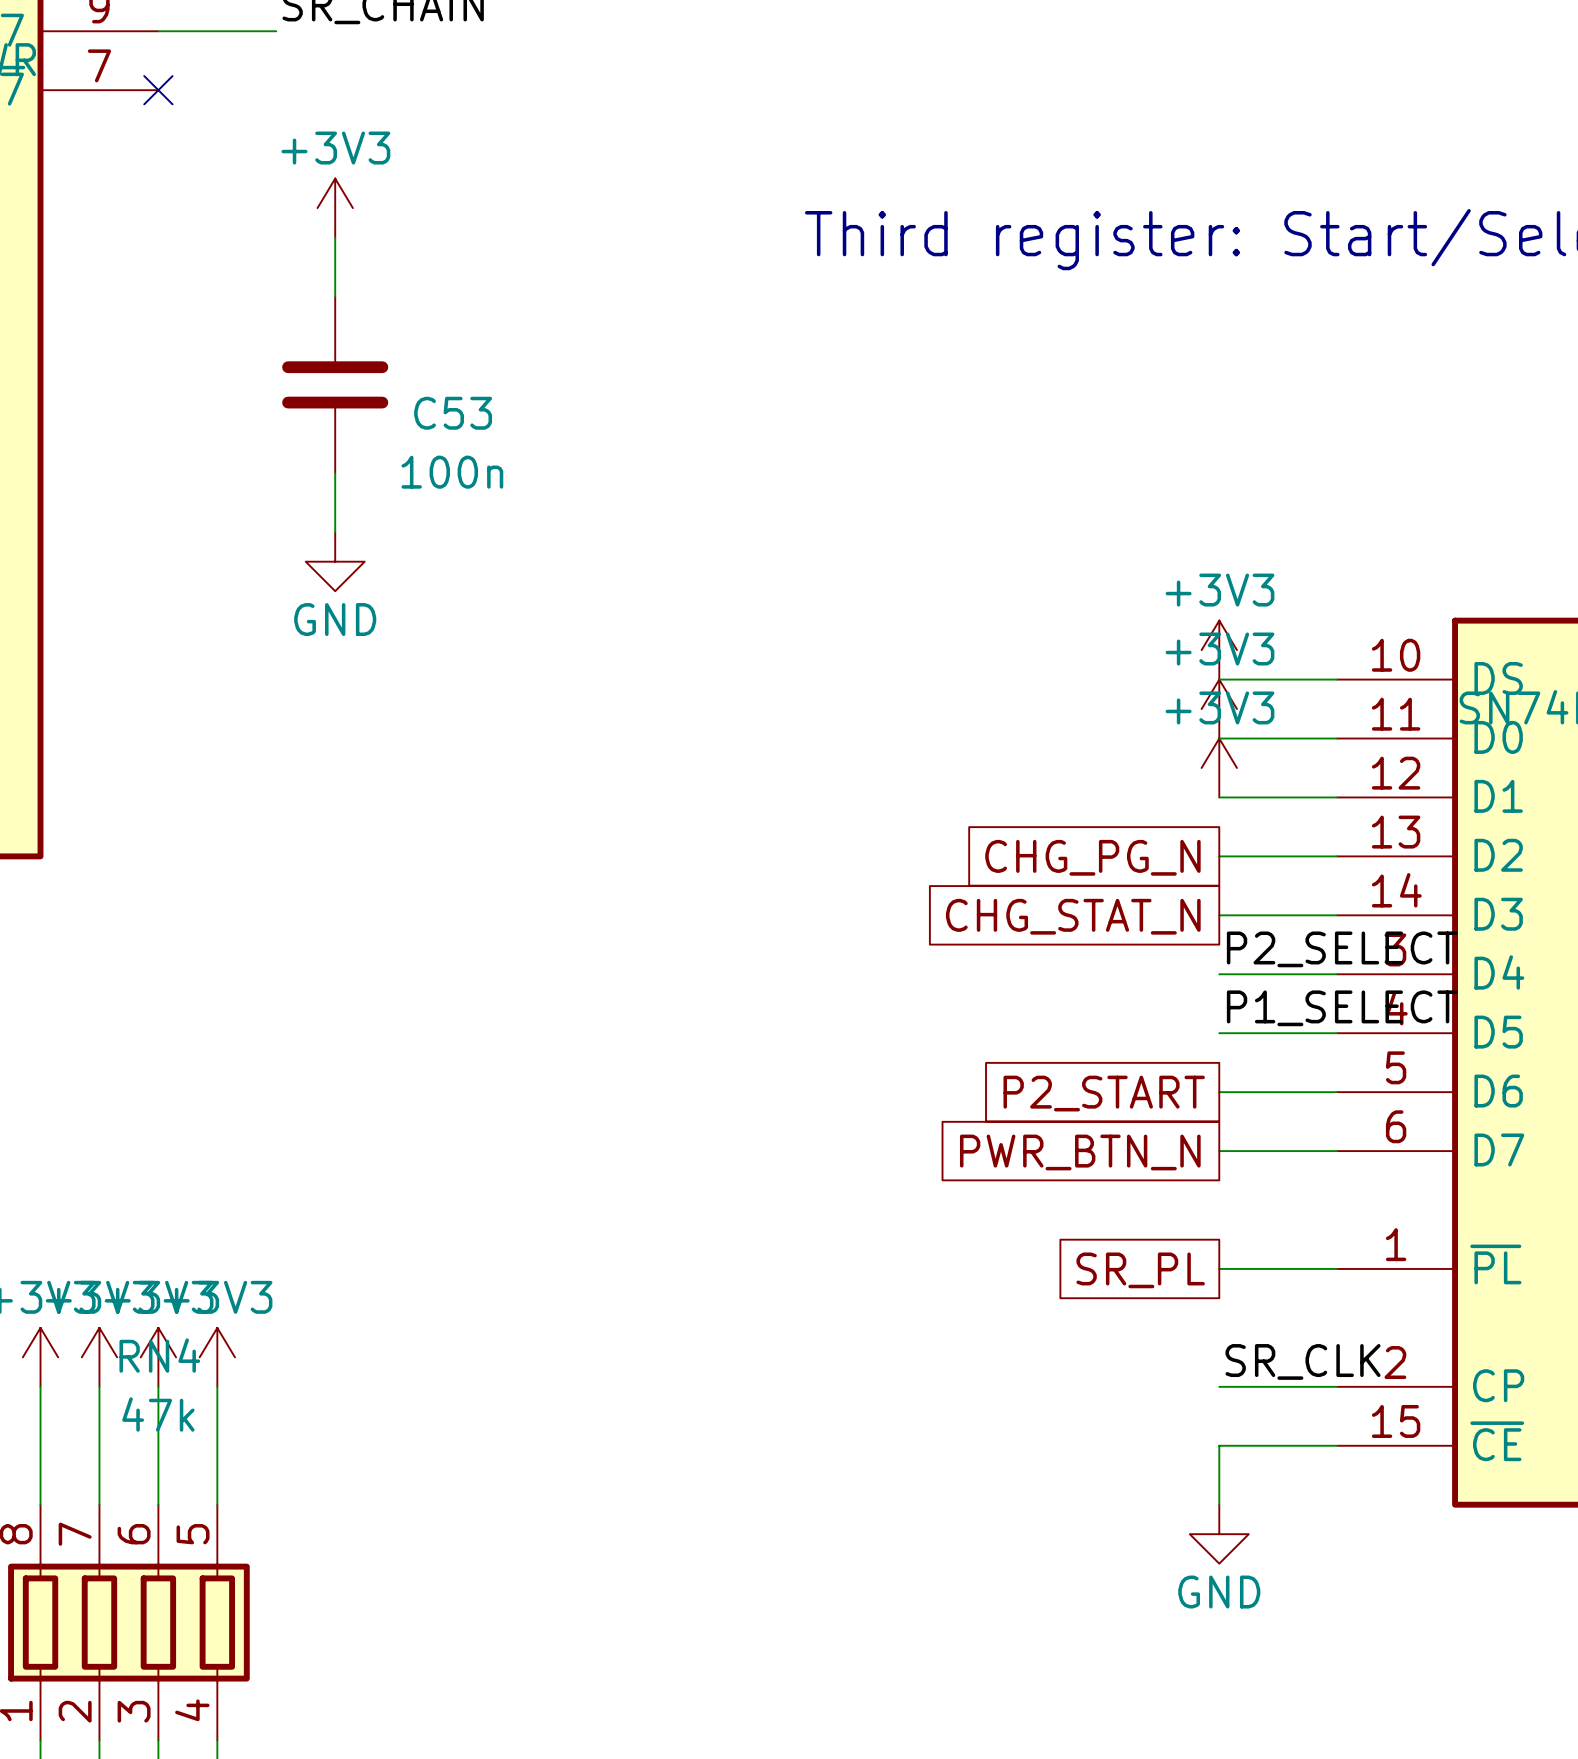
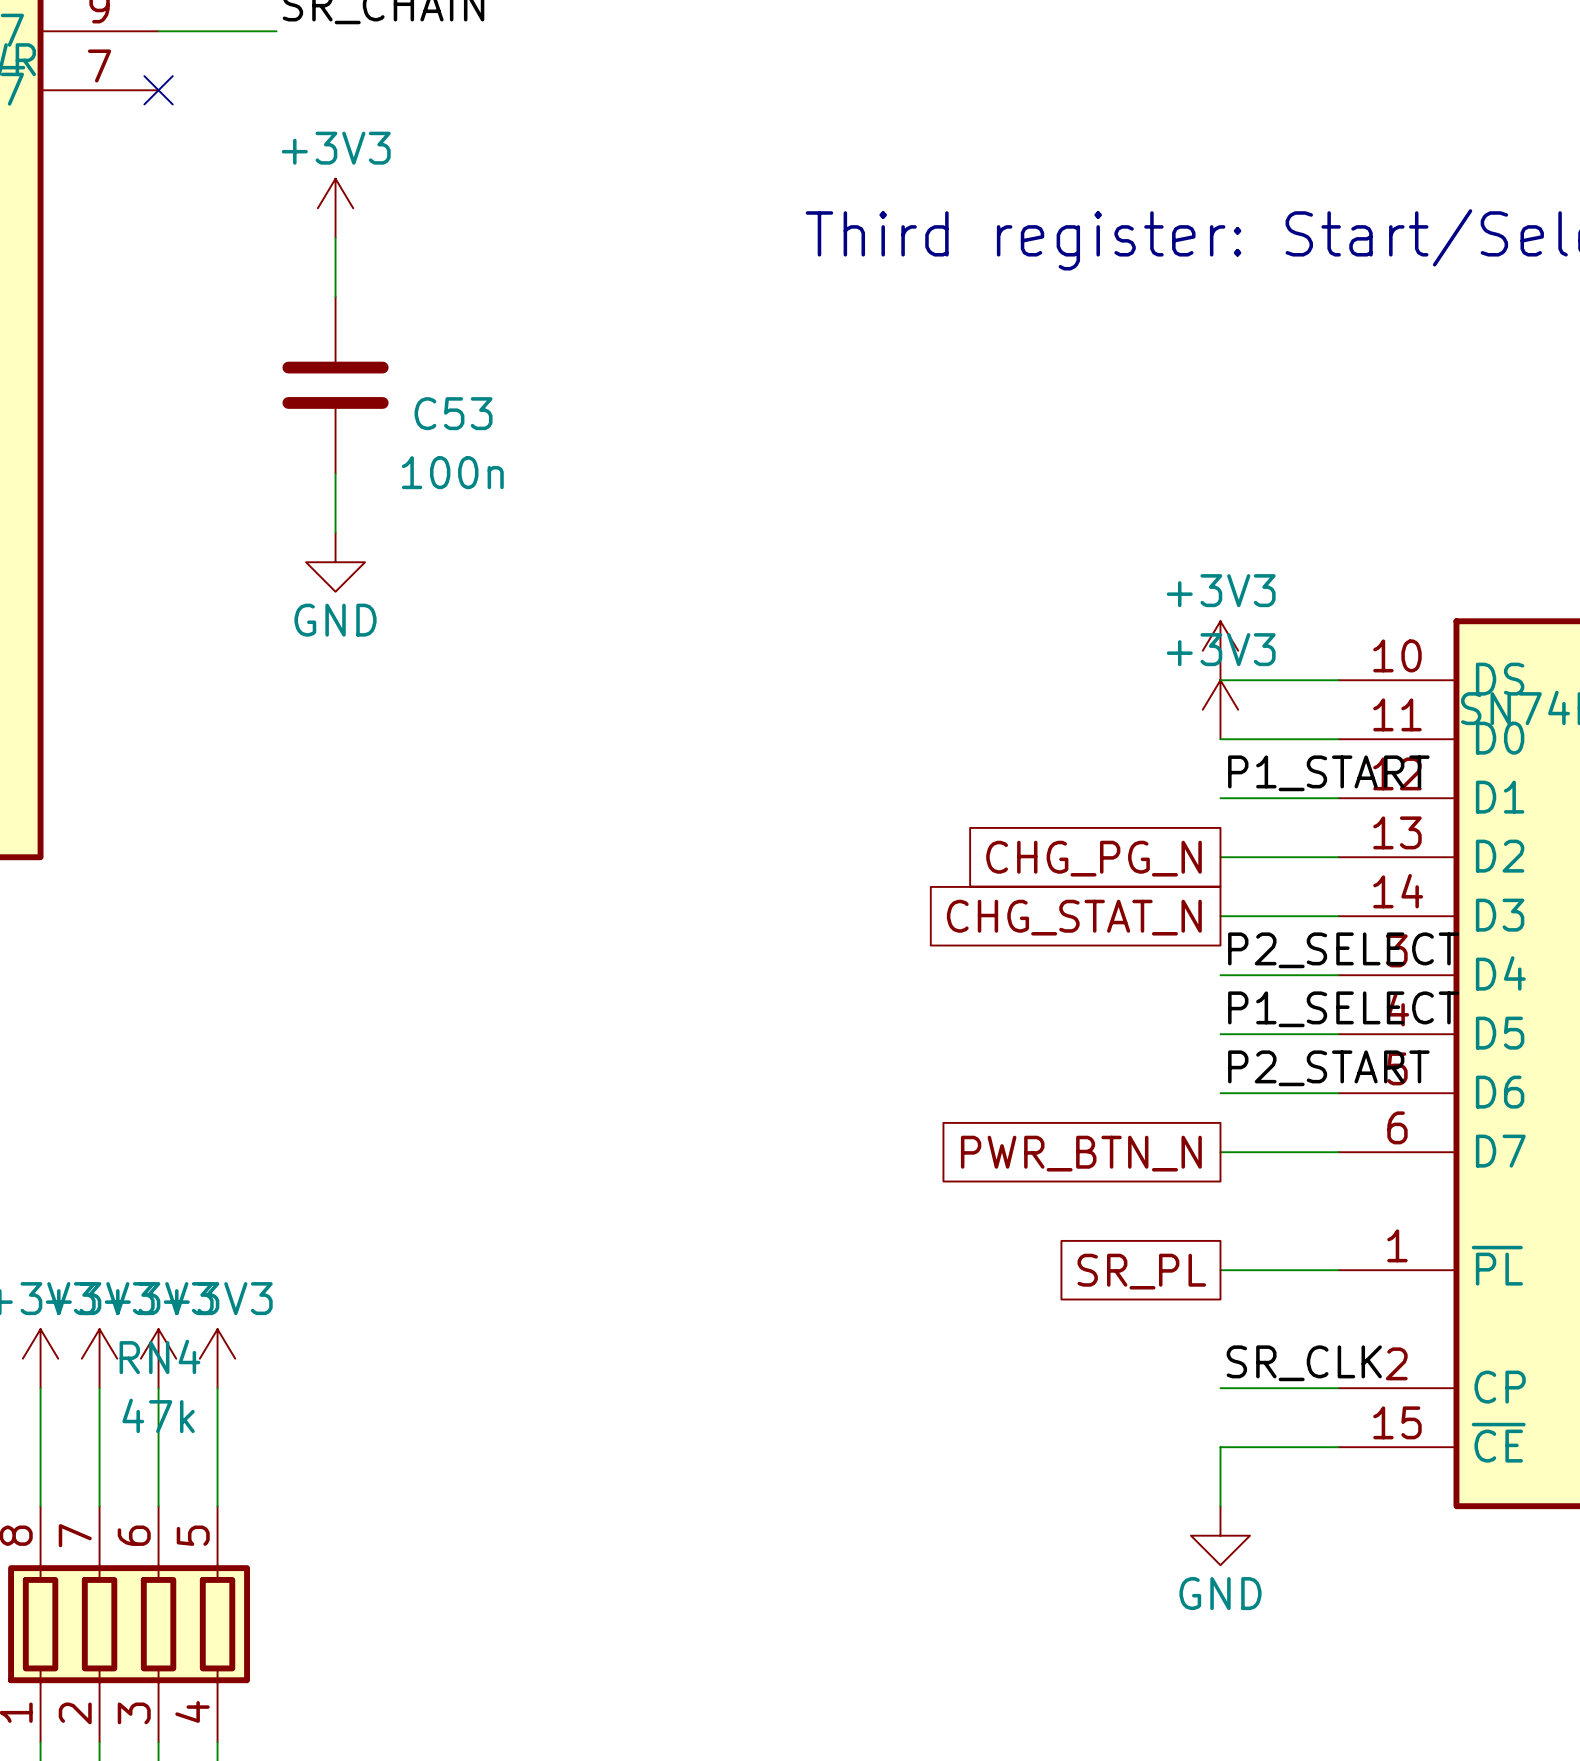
power symbol: +3V3 (1219, 767) -> none
label: none -> P1_START (1328, 773)
label: none -> P2_START (1328, 1068)
global label: P2_START (1104, 1093) -> none

